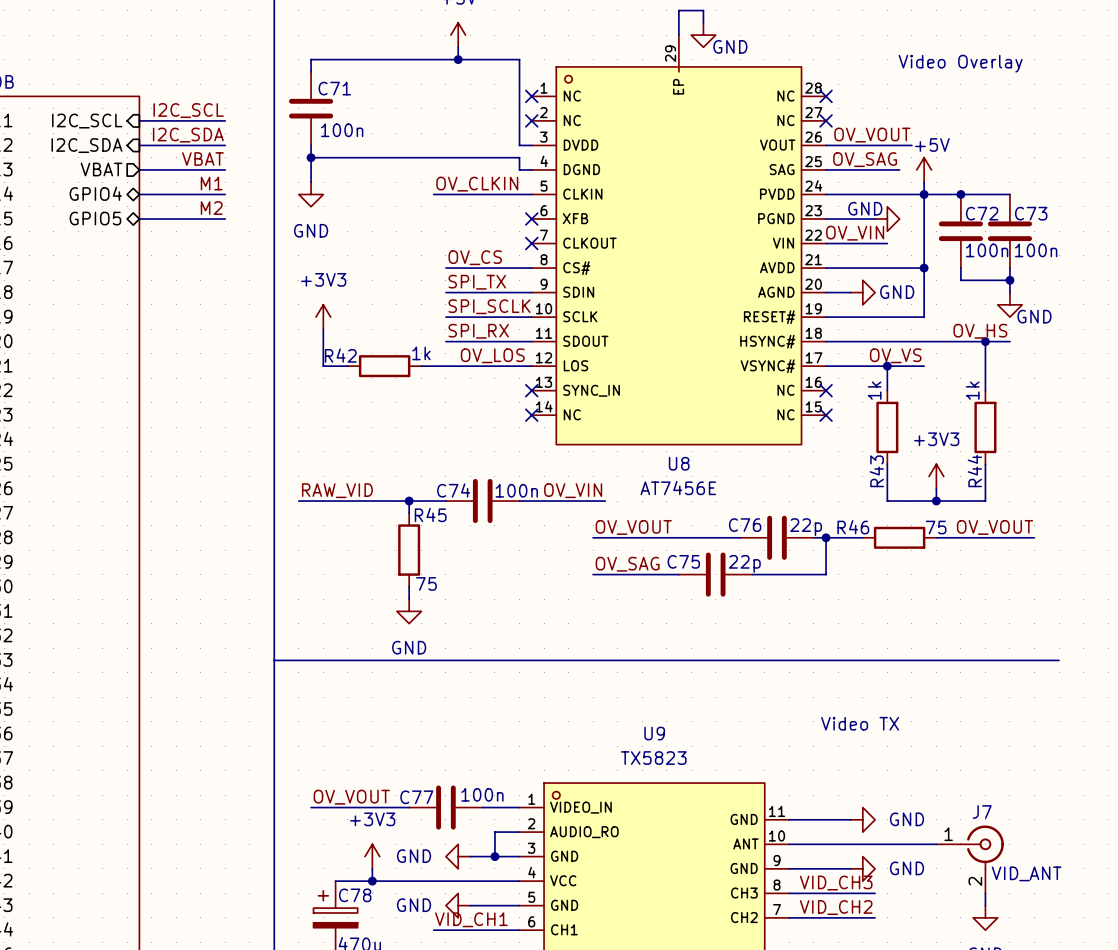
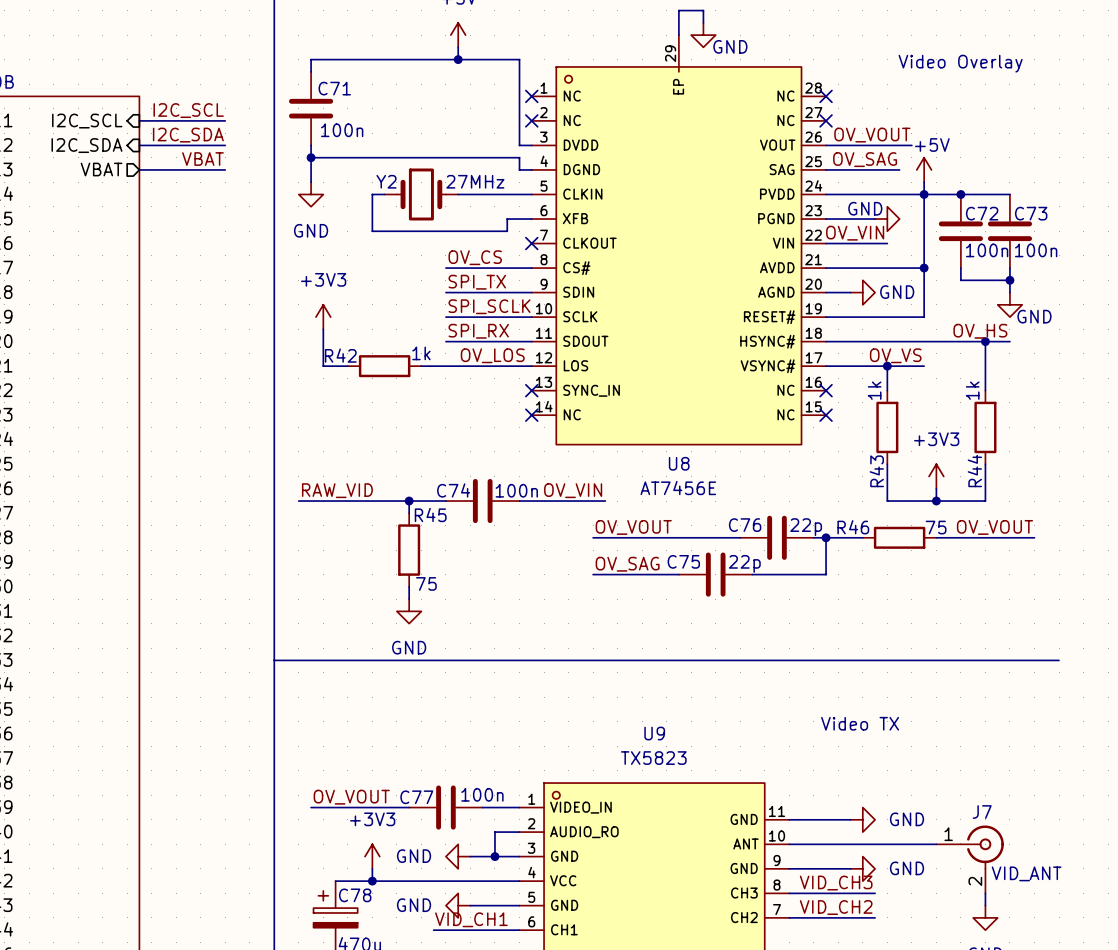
label: M1 (211, 183) -> none
label: OV_CLKIN (477, 184) -> none
sheet pin: GPIO4 (95, 193) -> none
wire: (139, 194) (225, 194) -> none
wire: none -> (384, 194) (372, 194) (372, 231) (507, 231) (507, 219) (531, 219)
Y2: none -> 27MHz (421, 194)
label: M2 (211, 208) -> none
sheet pin: GPIO5 (95, 218) -> none
wire: (139, 219) (225, 219) -> none
no-connect mark: (531, 219) -> none

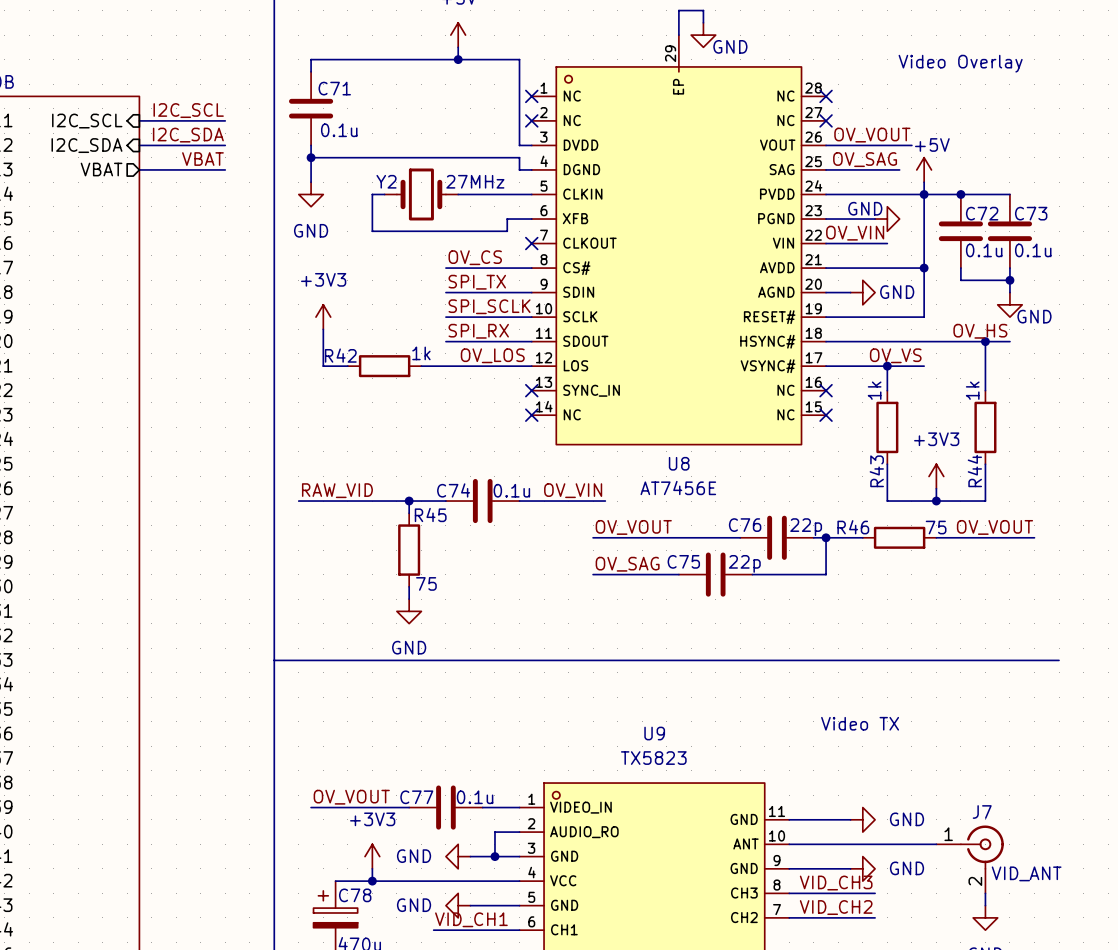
C71 value: 100n (342, 130) -> 0.1u (339, 130)
C72 value: 100n (987, 250) -> 0.1u (984, 250)
C73 value: 100n (1036, 250) -> 0.1u (1033, 250)
C74 value: 100n (516, 490) -> 0.1u (511, 490)
C77 value: 100n (482, 794) -> 0.1u (475, 797)

